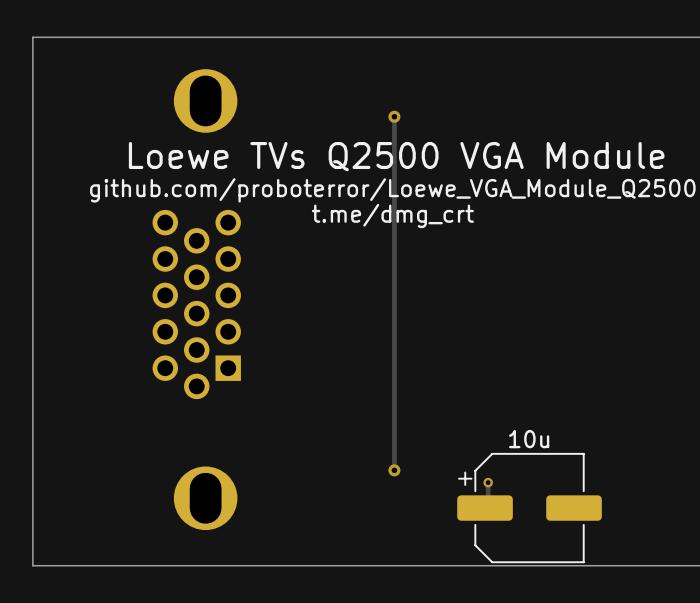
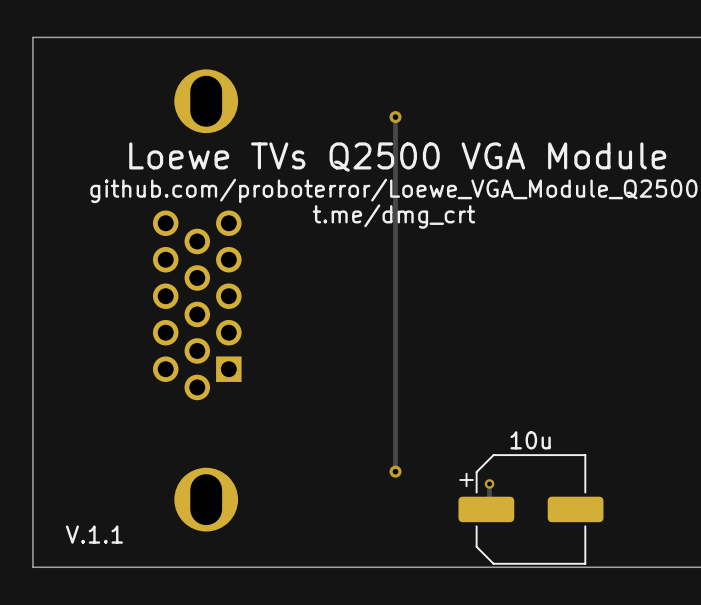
text: none -> V.1.1 (94, 534)

